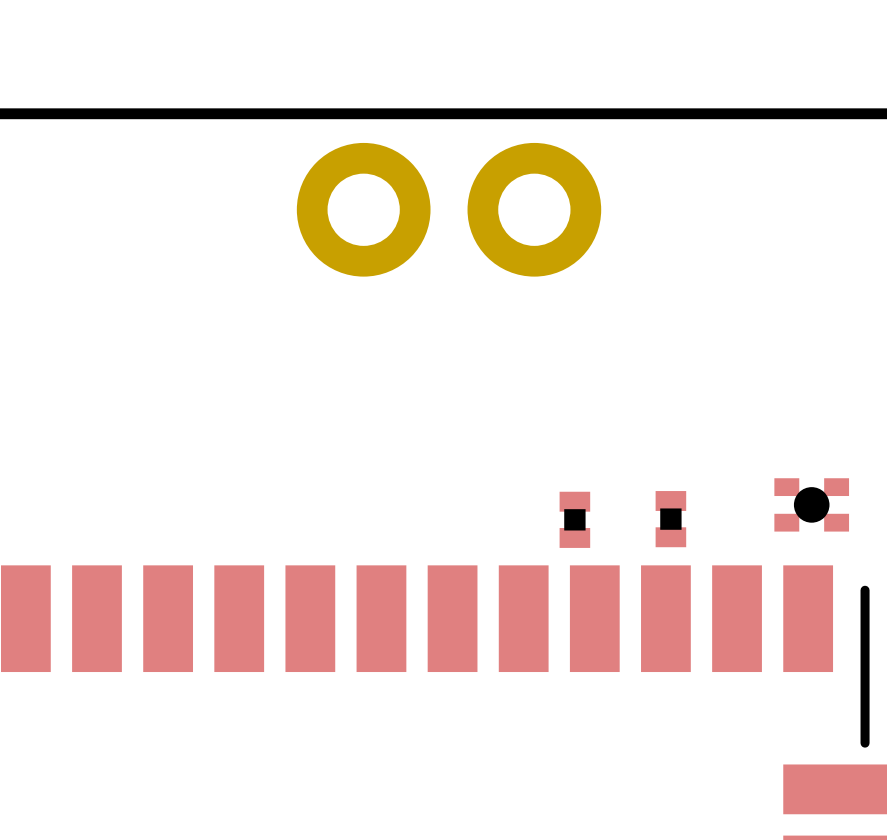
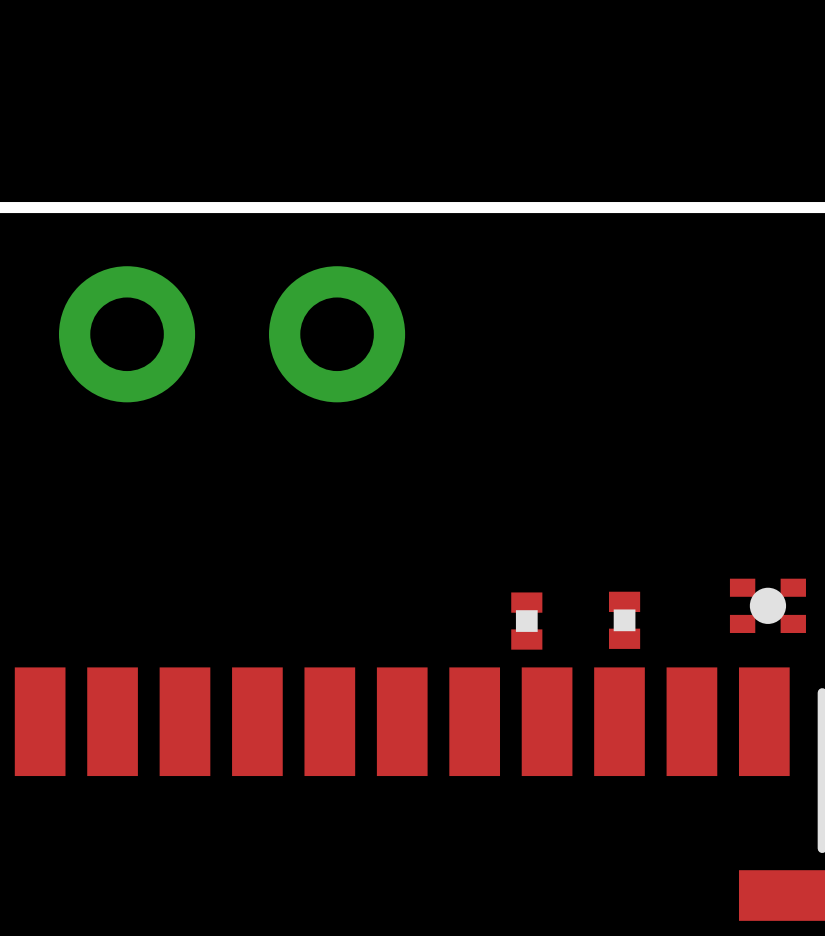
part position: (363, 209) -> (337, 334)
part position: (534, 209) -> (127, 334)

